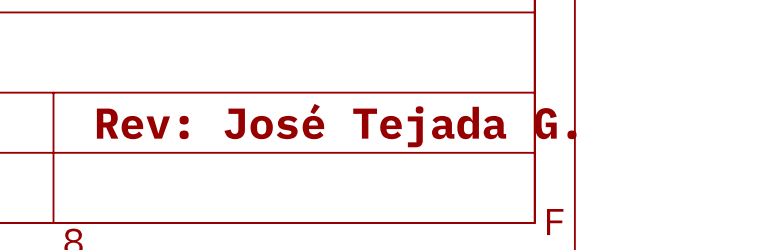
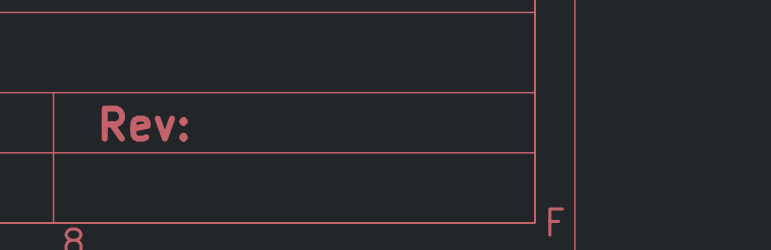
title block: Rev: José Tejada G. (336, 125) -> Rev: (144, 123)

